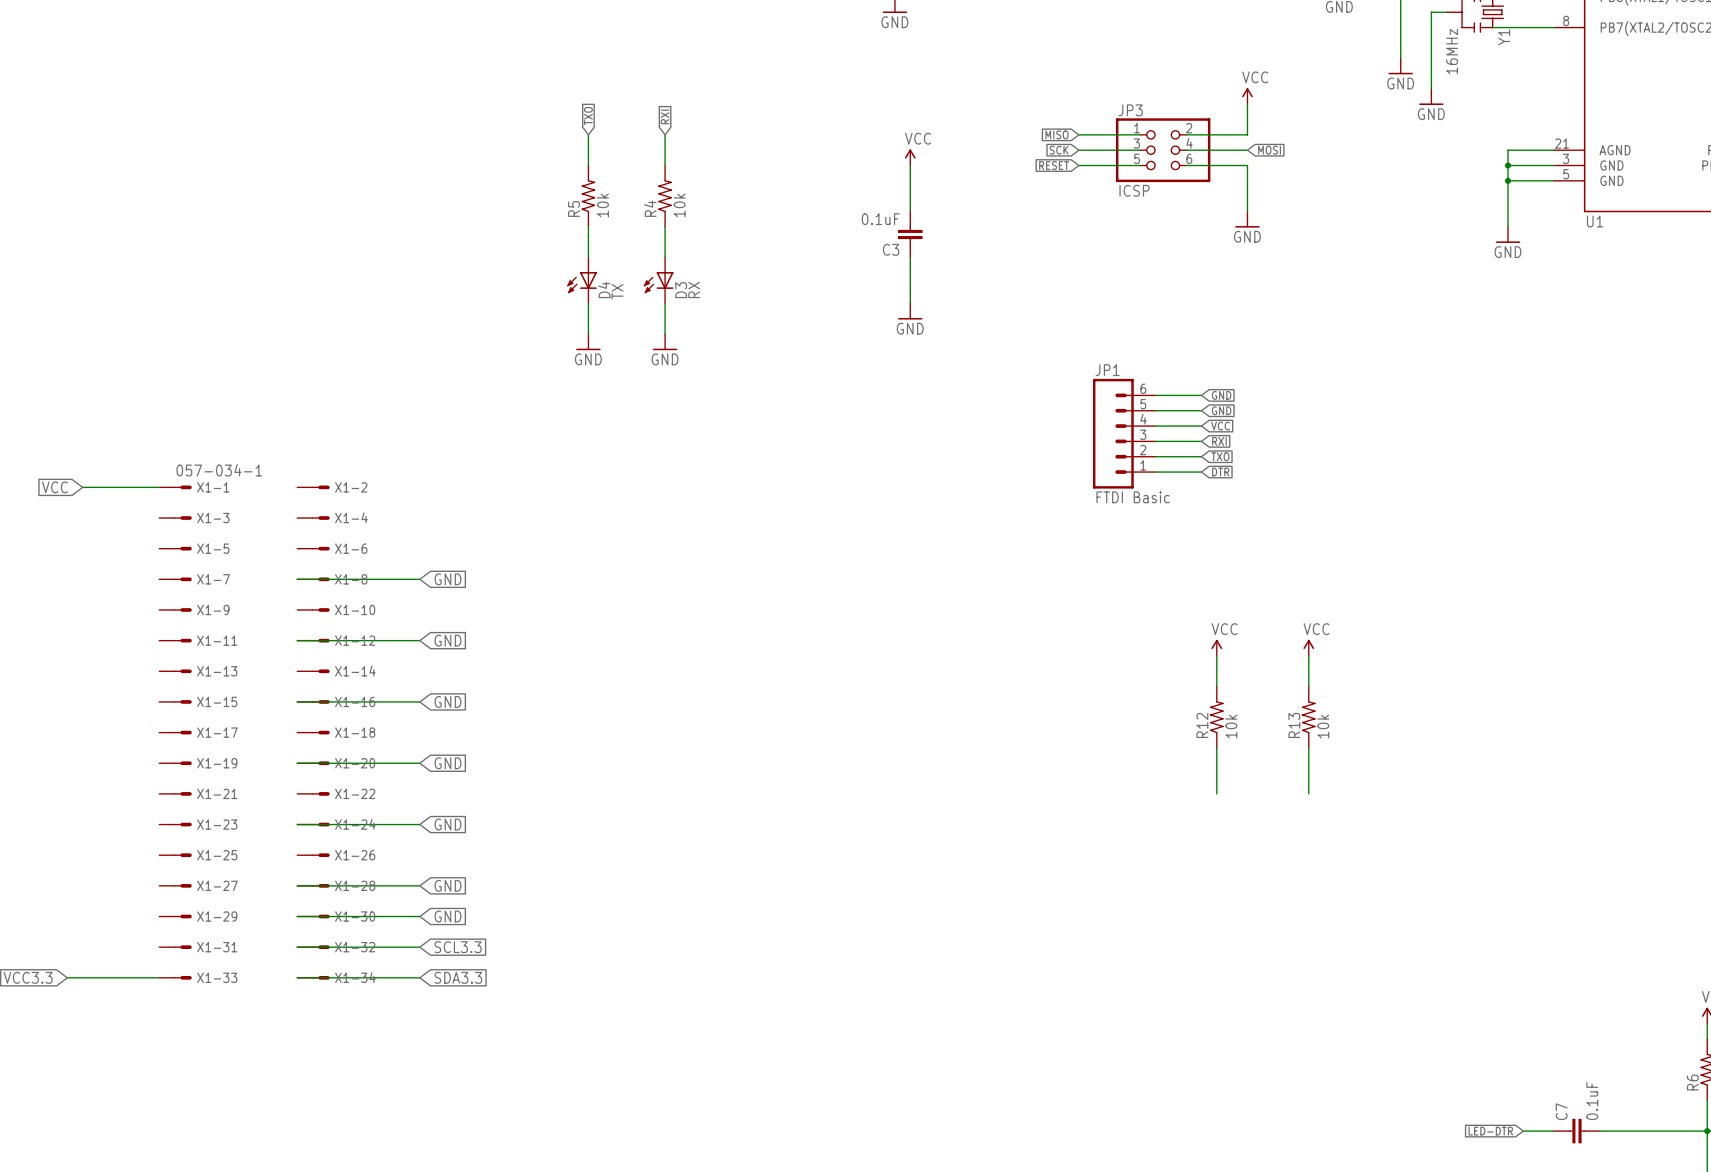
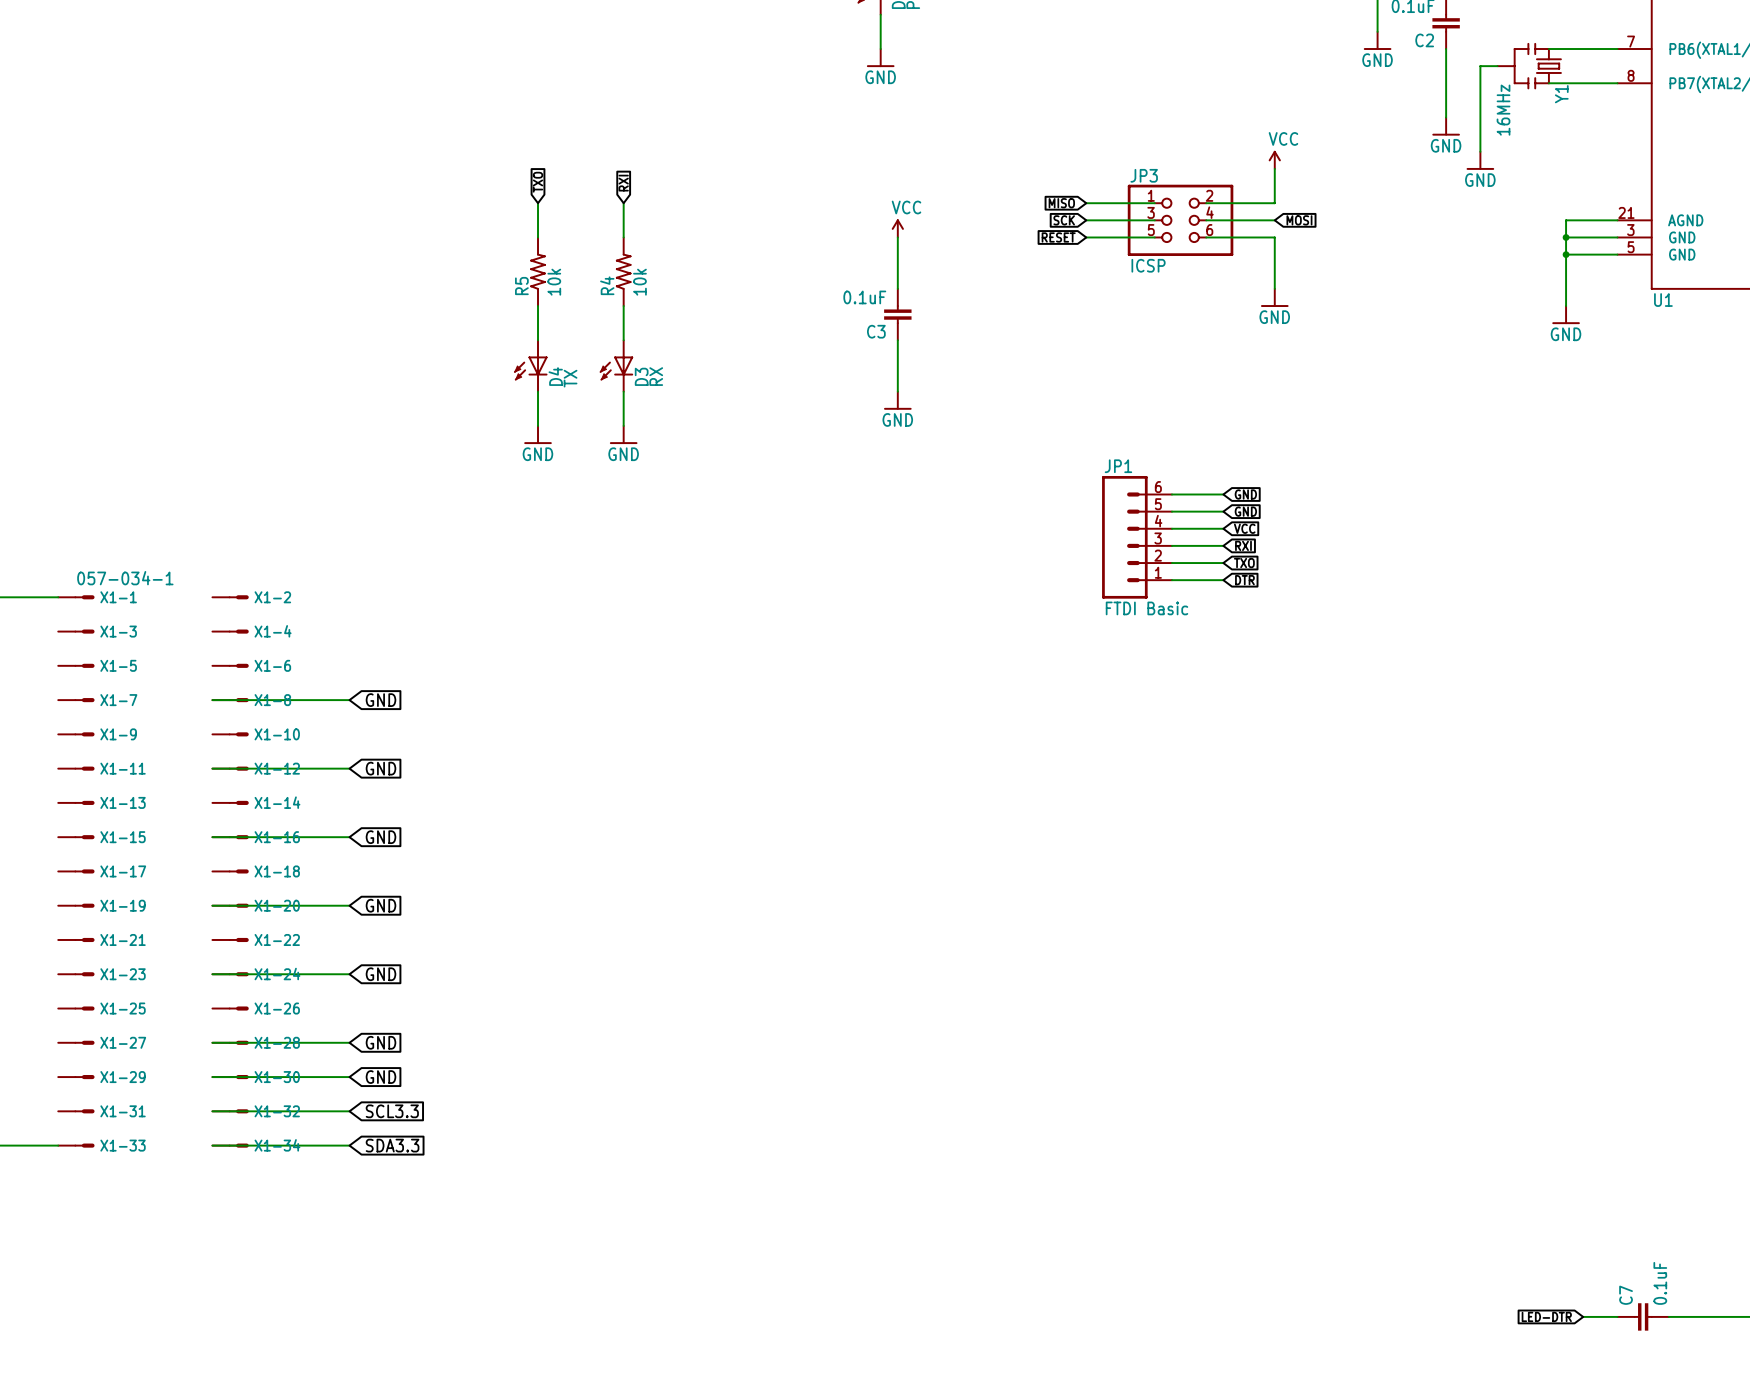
power symbol: VCC (1216, 647) -> none
power symbol: VCC (1308, 647) -> none
wire: (1216, 655) (1216, 686) -> none
wire: (1308, 655) (1308, 686) -> none
R12: 10k (1216, 717) -> none
R13: 10k (1308, 717) -> none
wire: (1216, 747) (1216, 793) -> none
wire: (1308, 747) (1308, 793) -> none

